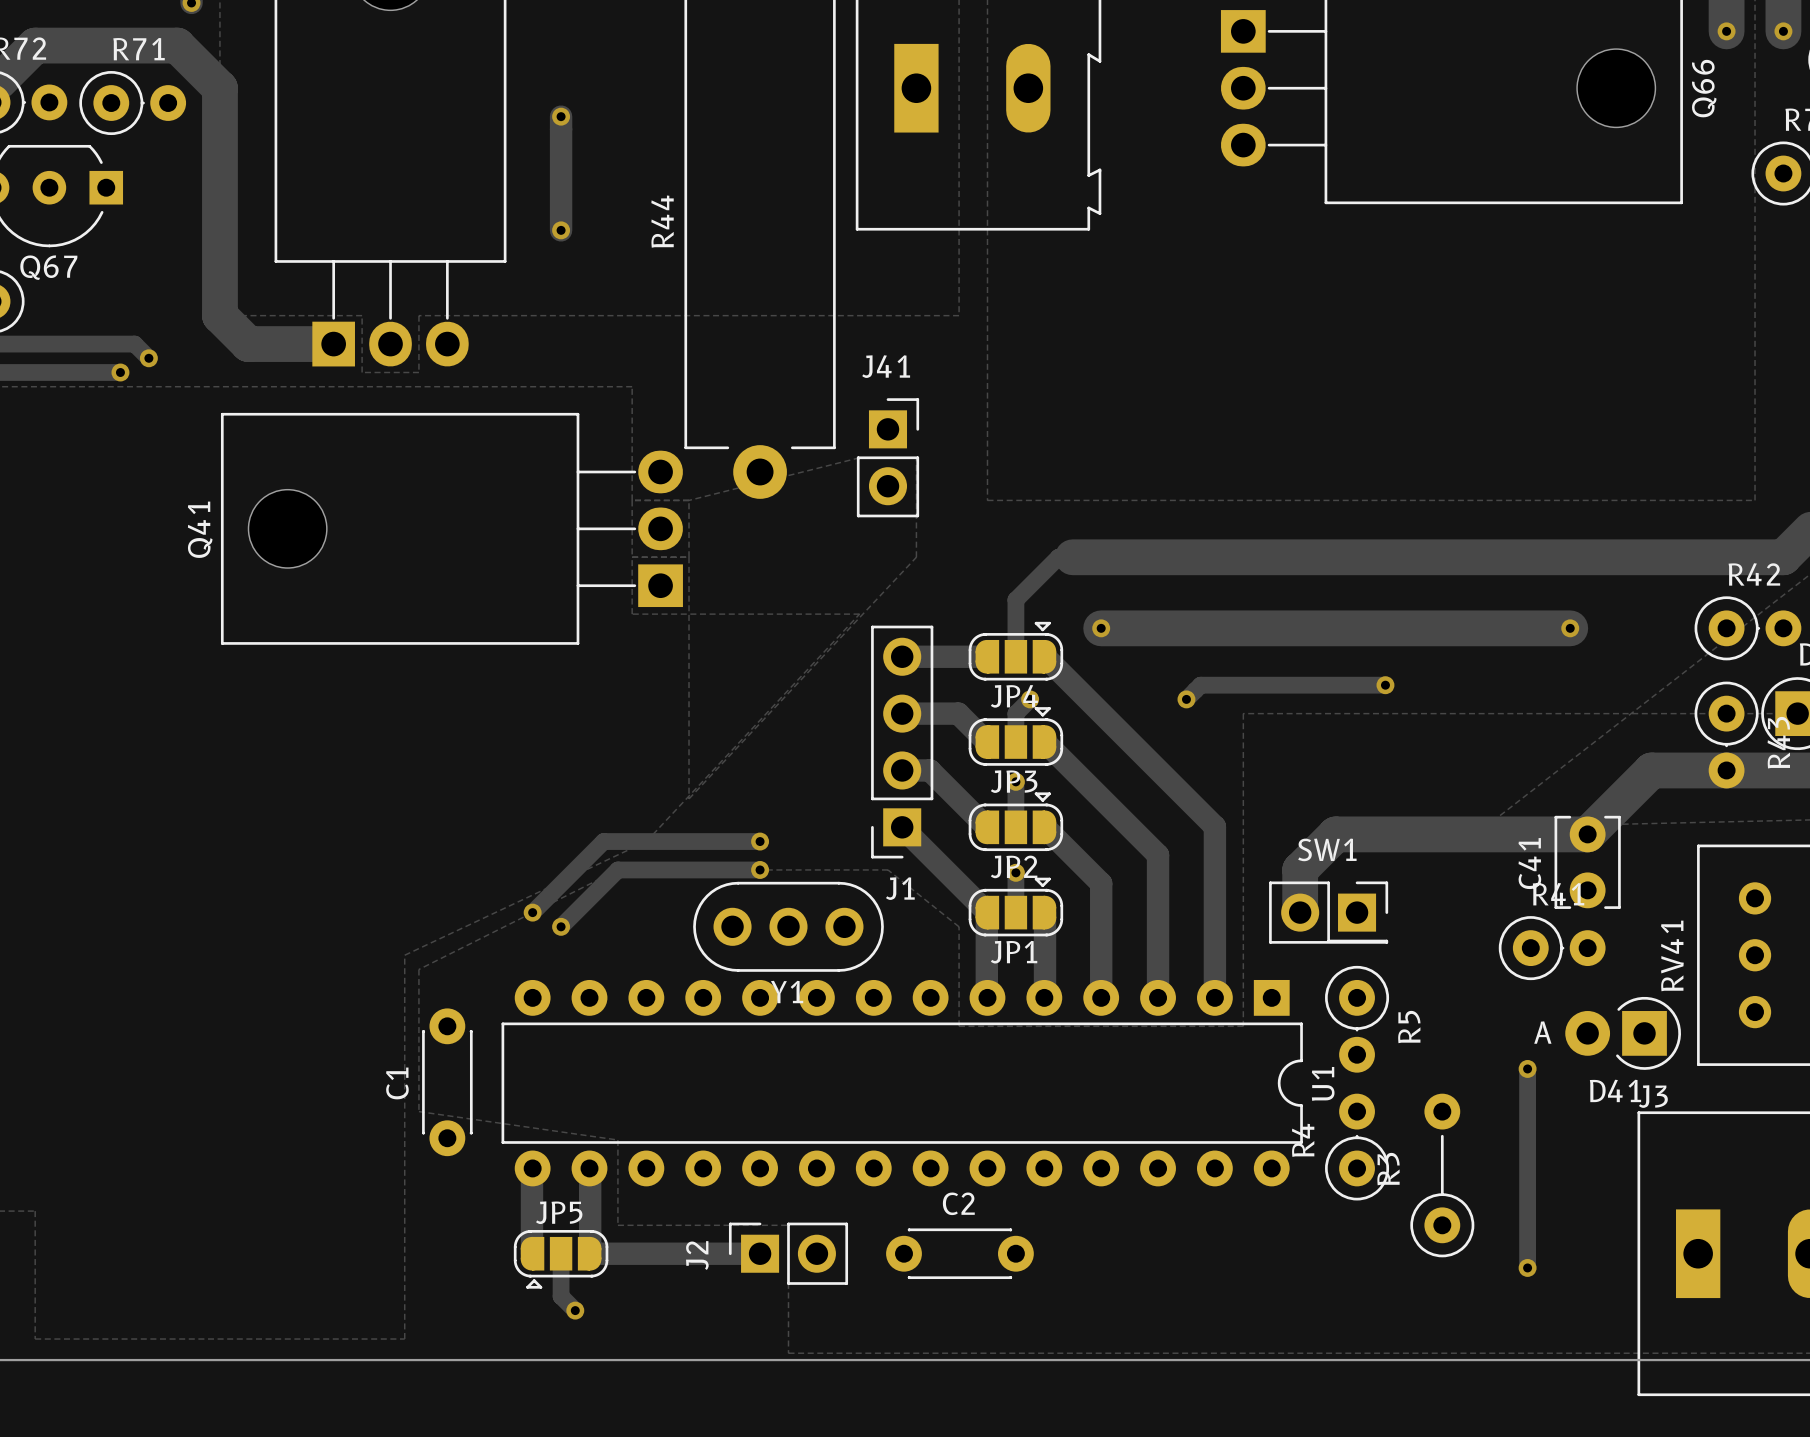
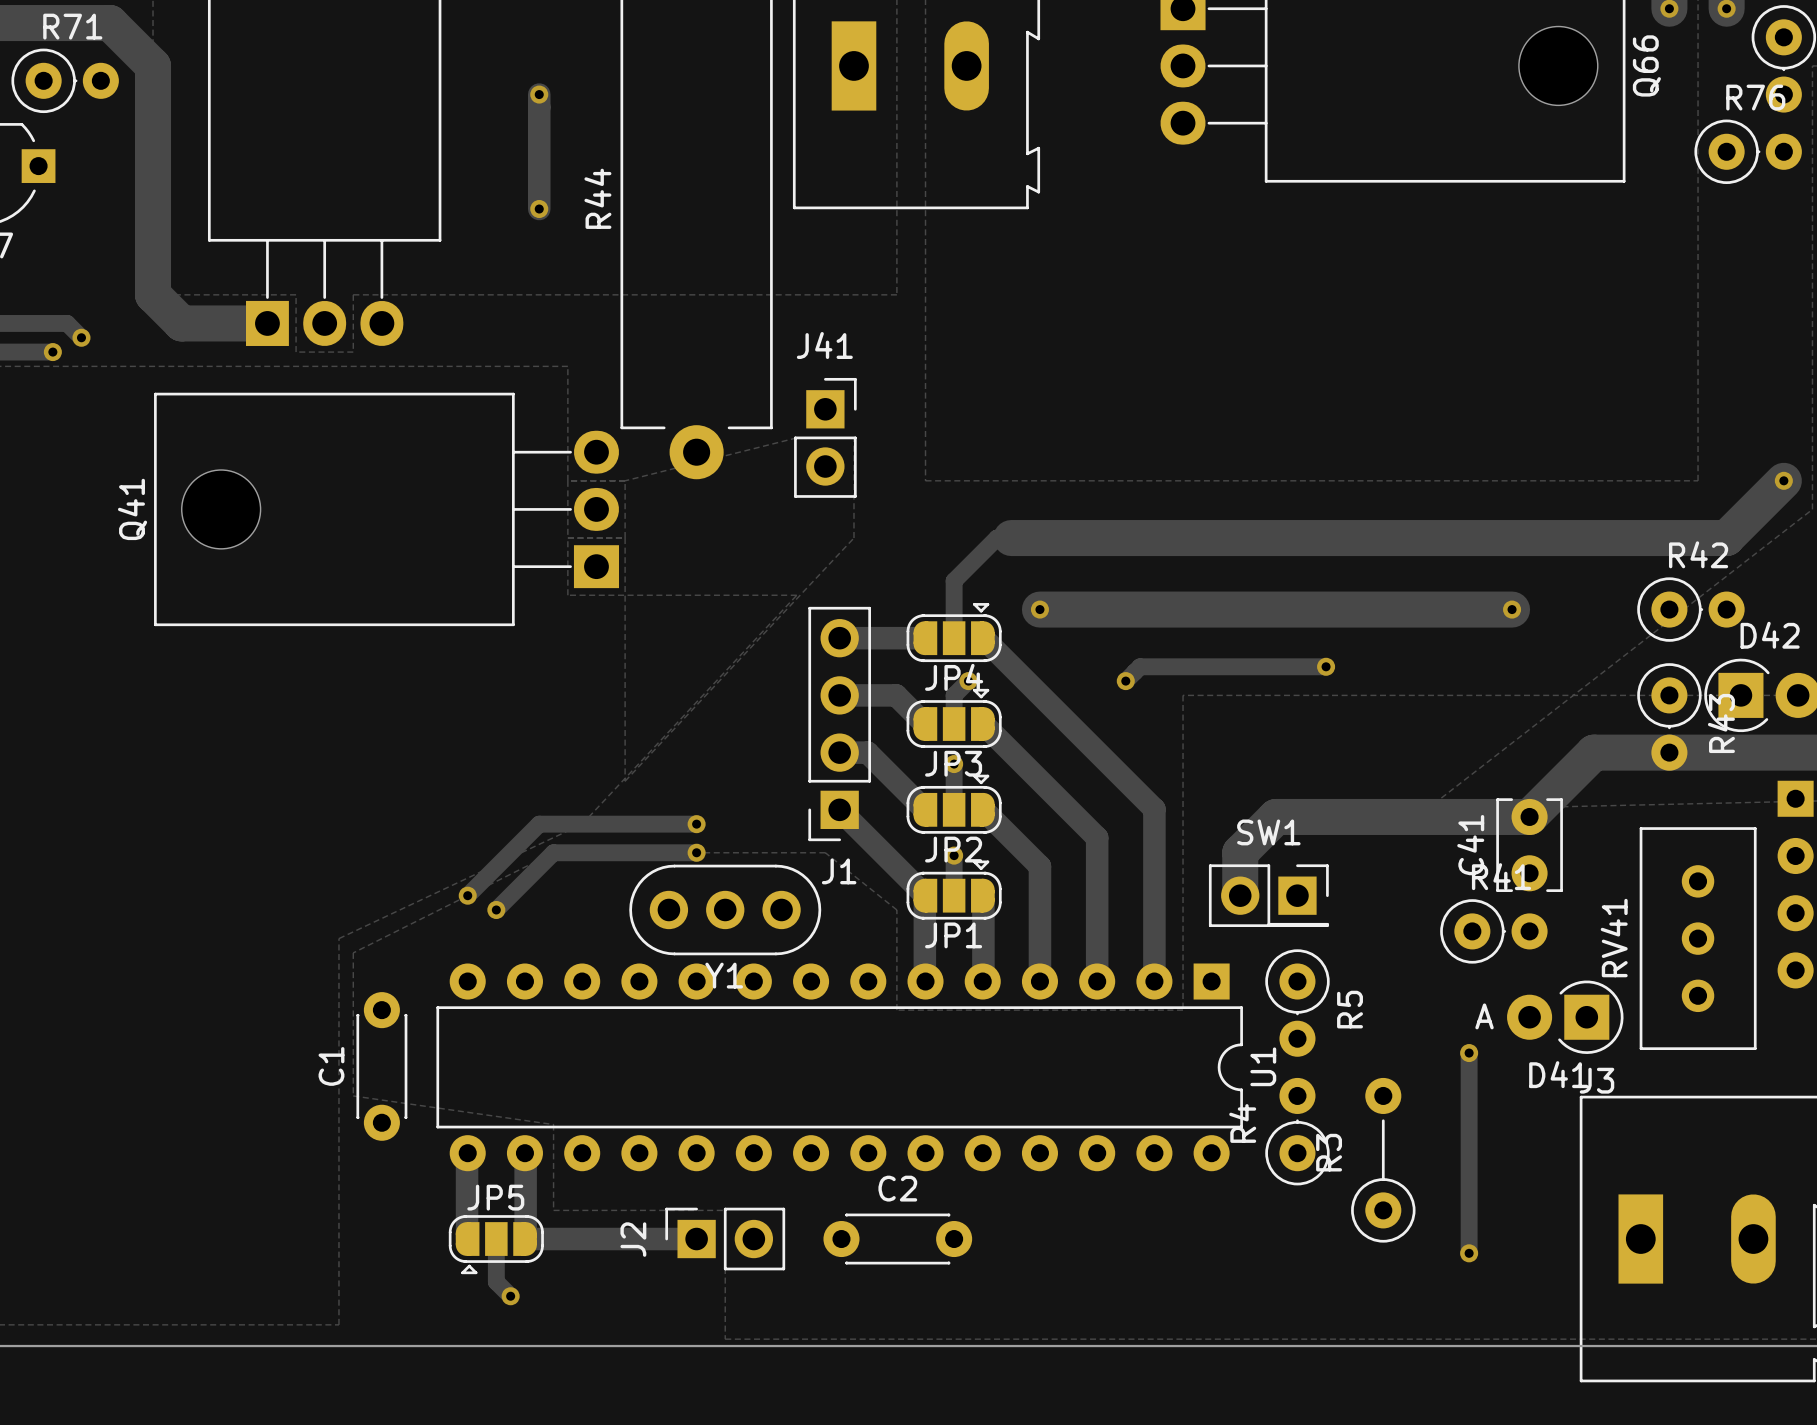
track: (561, 116) (561, 230) -> (539, 94) (539, 209)
via position: (561, 116) -> (539, 94)
via position: (561, 230) -> (539, 209)

